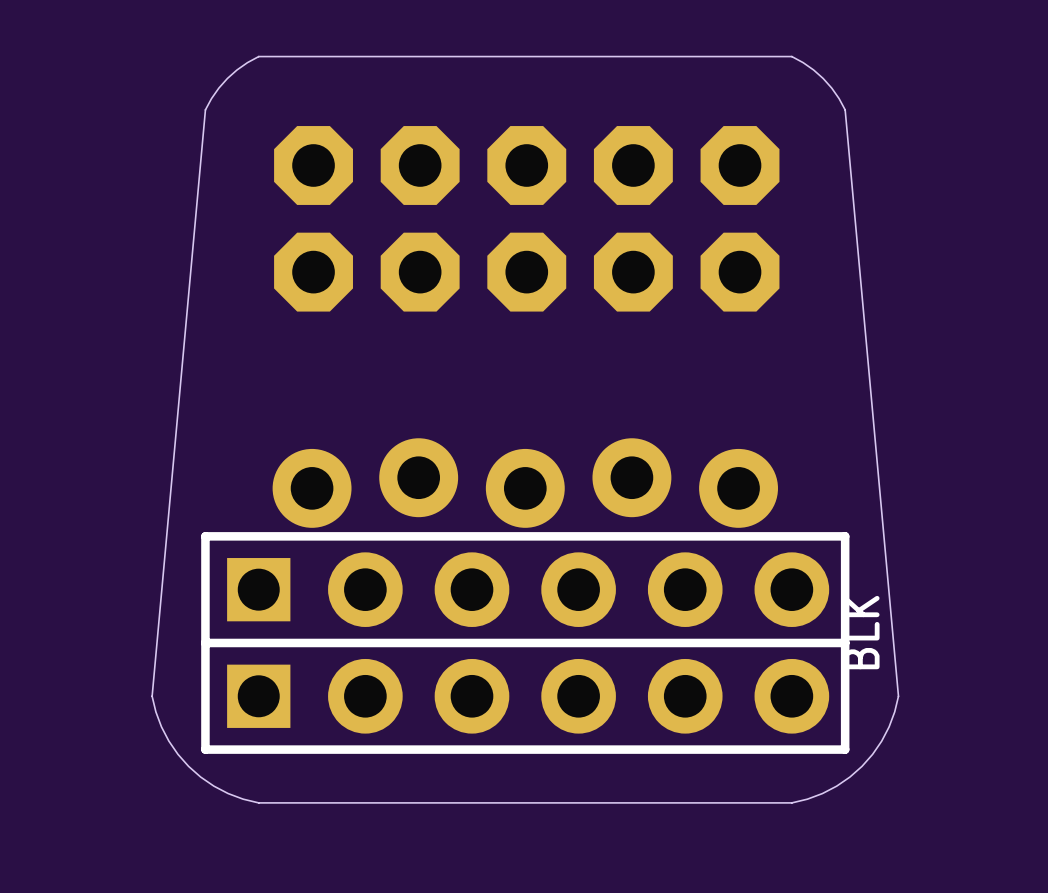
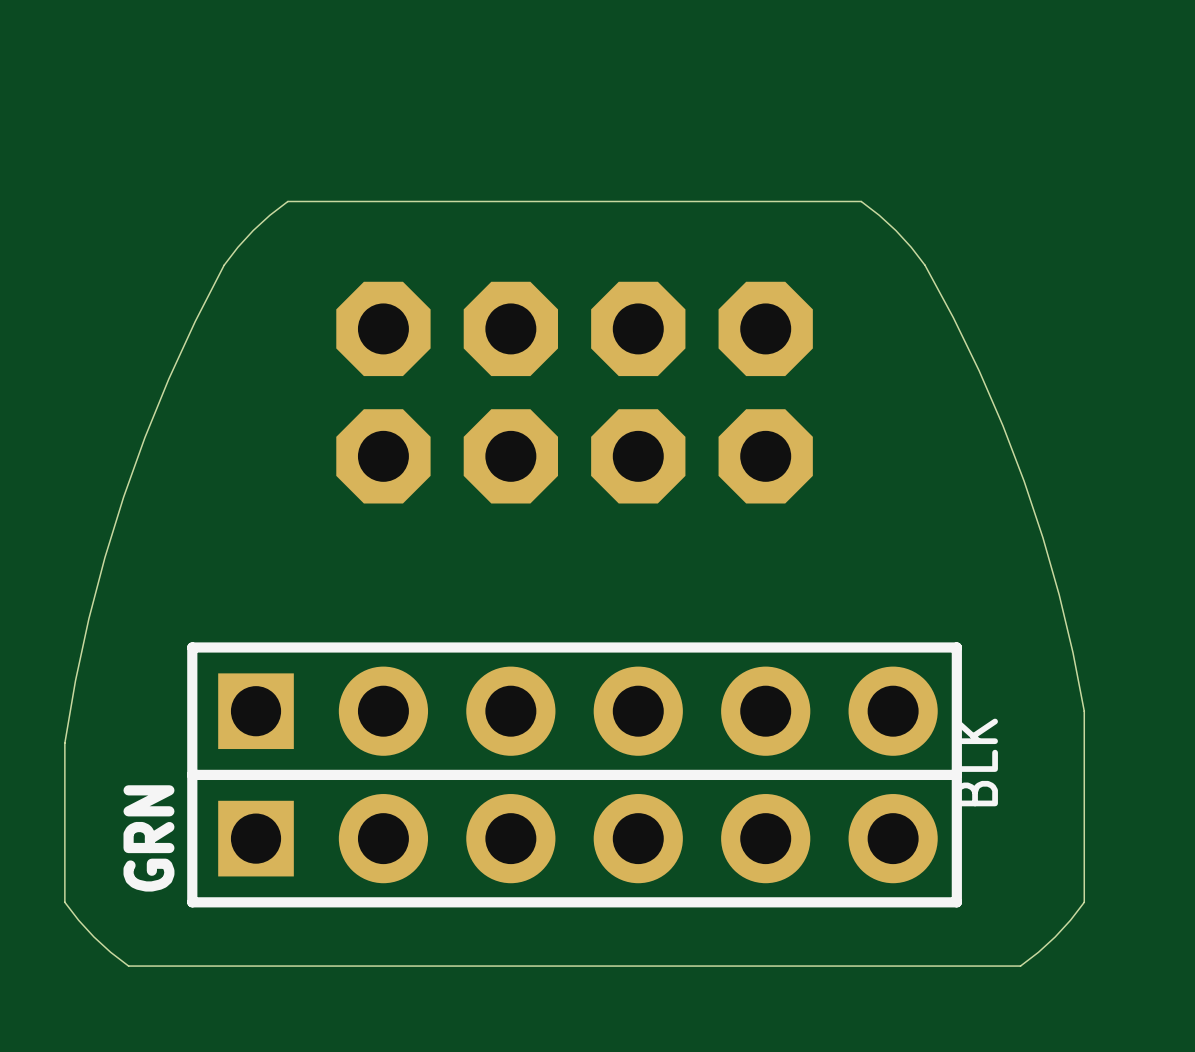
part: (526, 218) -> none
part: none -> (574, 392)
part: (525, 483) -> none
text: none -> GRN (148, 838)
board edge: (791, 802) (822, 793) (849, 777) (861, 766) (872, 754) (889, 726) (898, 696) (845, 109) (823, 78) (791, 56) (258, 56) (236, 70) (218, 88) (205, 109) (152, 696) (161, 726) (178, 754) (188, 766) (200, 777) (228, 793) (258, 802) -> (893, 966) (1020, 966) (1055, 936) (1084, 902) (1084, 711) (1059, 594) (1042, 537) (1002, 425) (979, 371) (924, 265) (895, 230) (861, 201) (287, 201) (253, 230) (237, 247) (224, 265) (168, 378) (123, 497) (104, 557) (88, 618) (64, 743) (64, 902) (93, 936) (128, 966) (256, 966)

